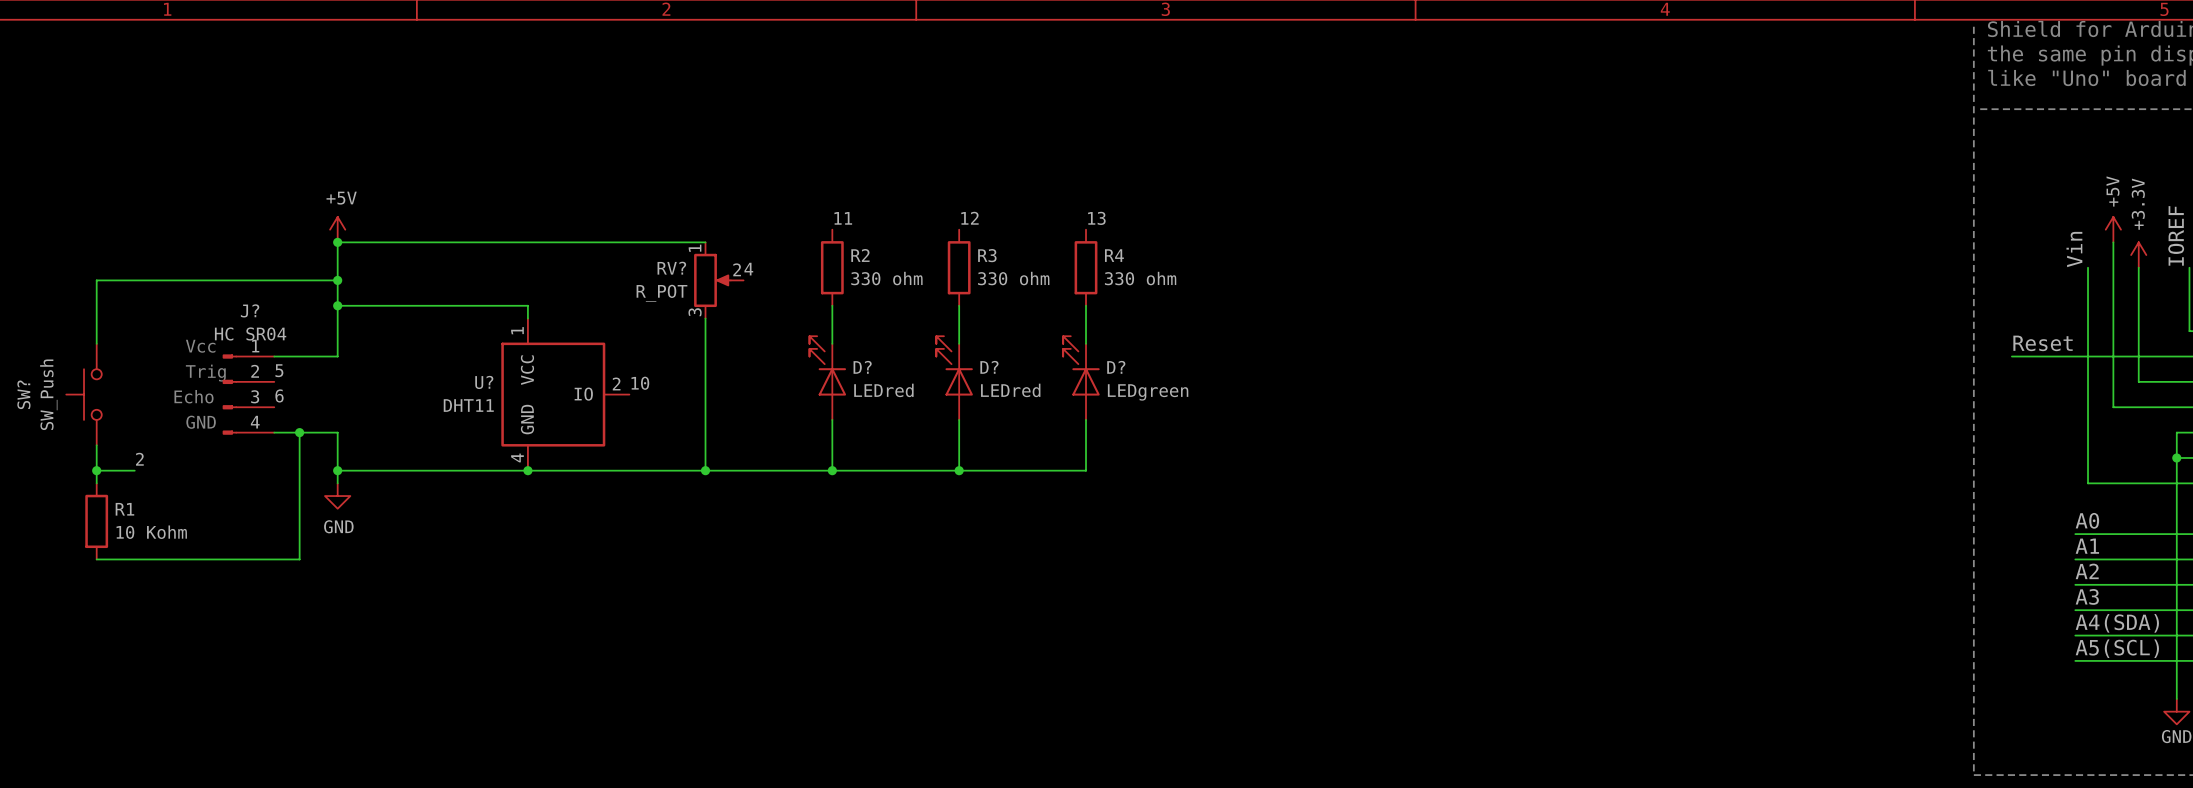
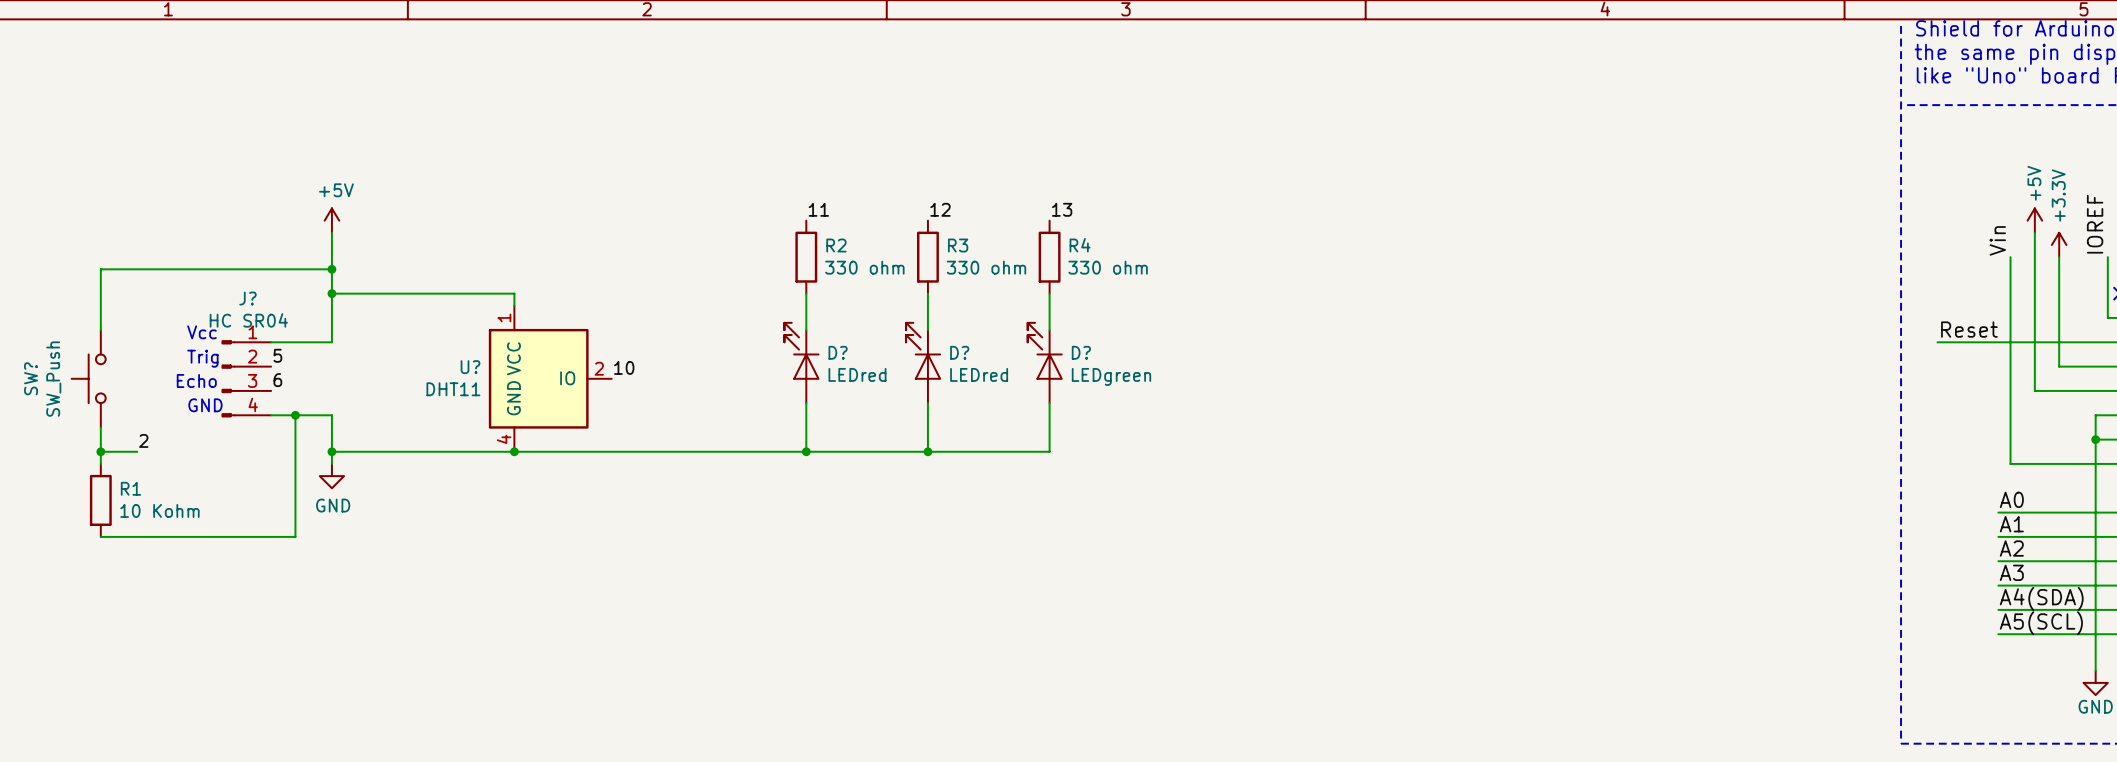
wire: (337, 242) (705, 242) -> none
junction: (337, 242) -> none
label: 4 (748, 269) -> none
RV?: R_POT (718, 280) -> none
wire: (705, 318) (705, 470) -> none
junction: (705, 470) -> none

